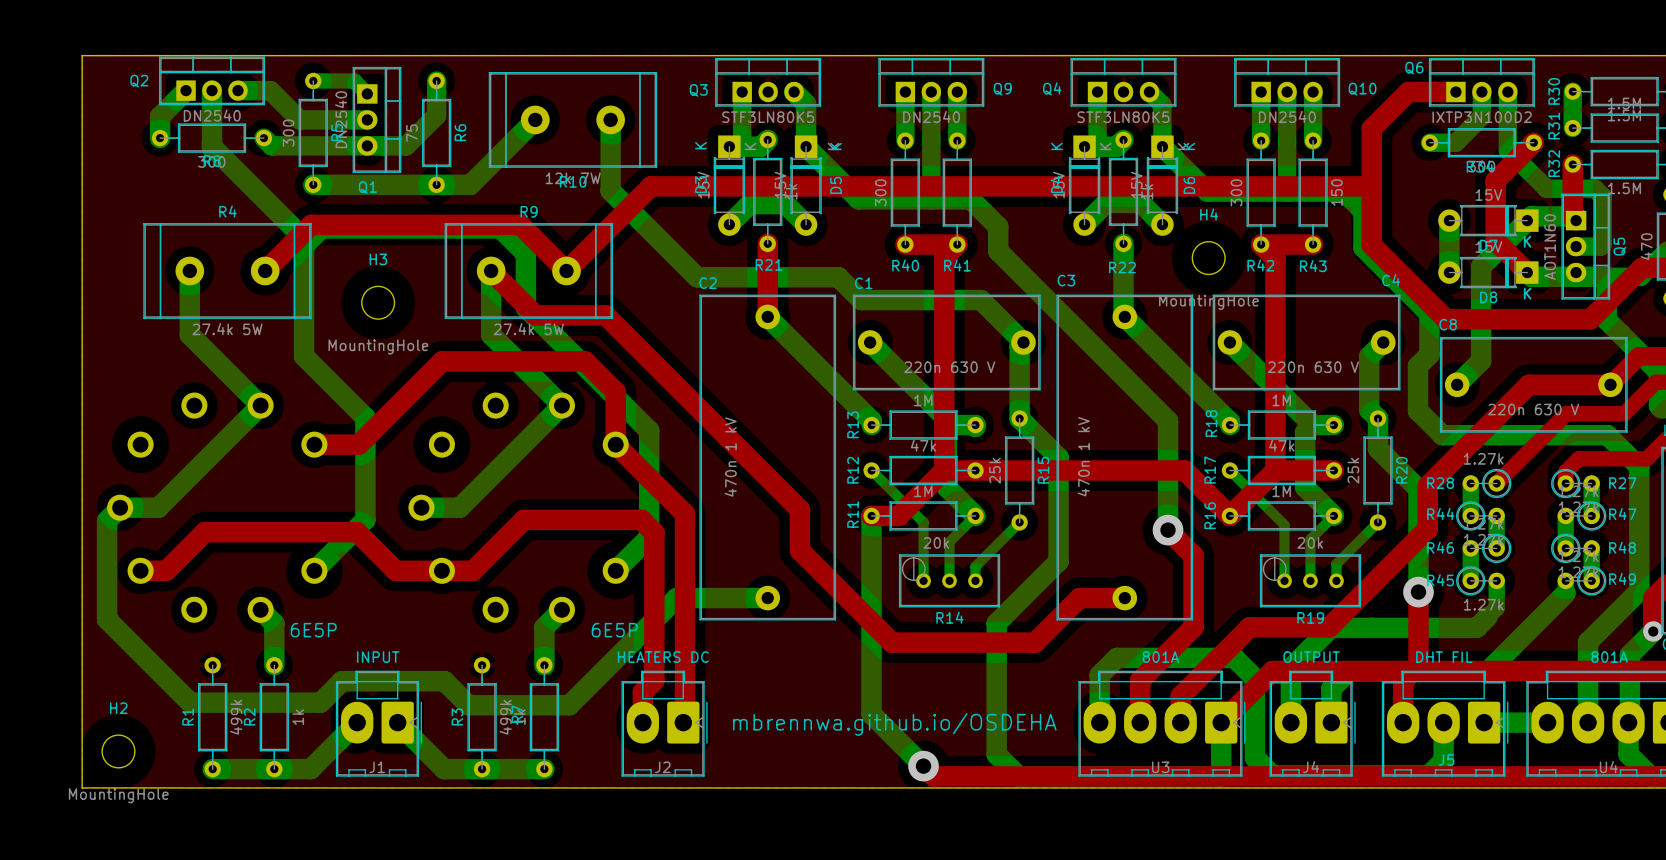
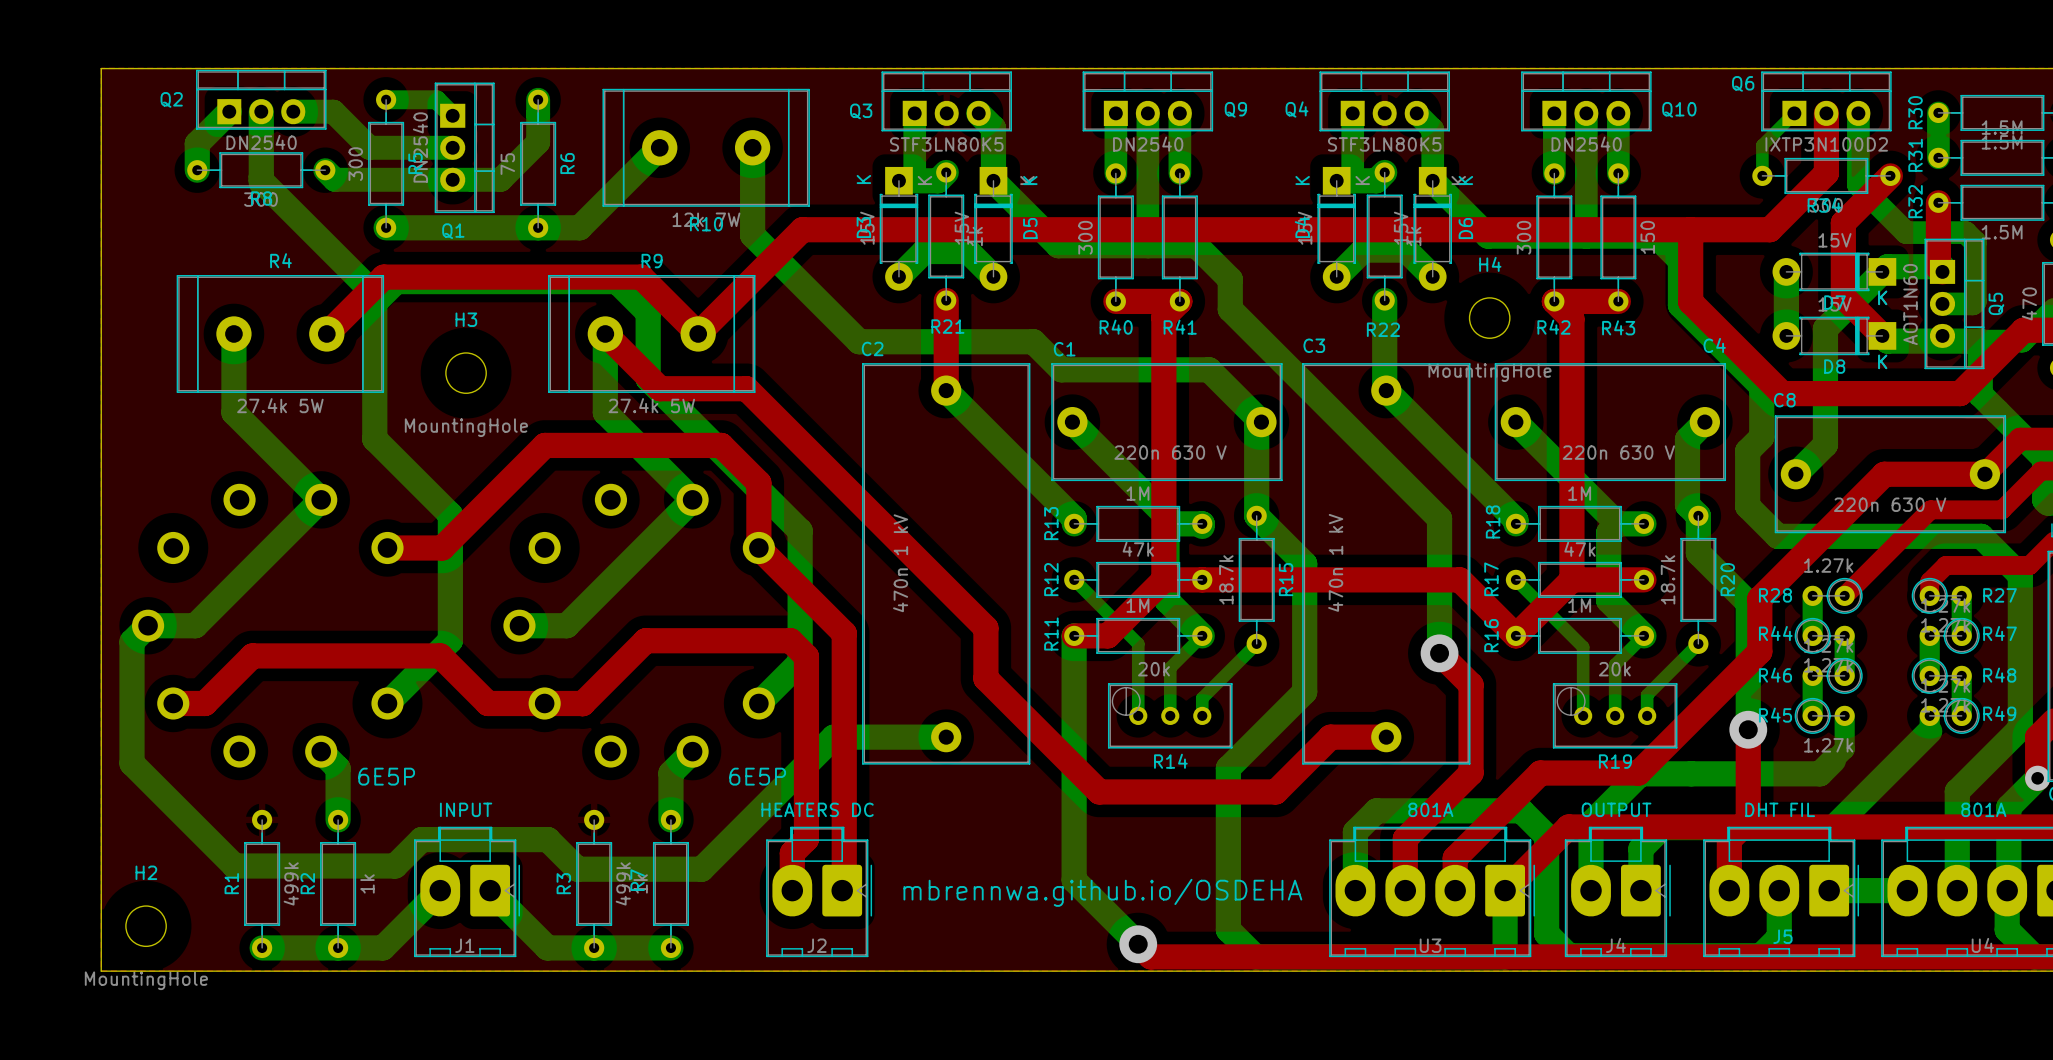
top track: (1451, 92) (1408, 92) (1371, 128) (1371, 186) -> (1826, 113) (1826, 173) (1769, 229) (1690, 229)
bottom track: (1481, 92) (1481, 116) (1455, 142) (1429, 142) -> (1794, 113) (1762, 145) (1762, 175)
R15 value: 25k (995, 470) -> 18.7k (1226, 579)
R20 value: 25k (1353, 470) -> 18.7k (1668, 579)

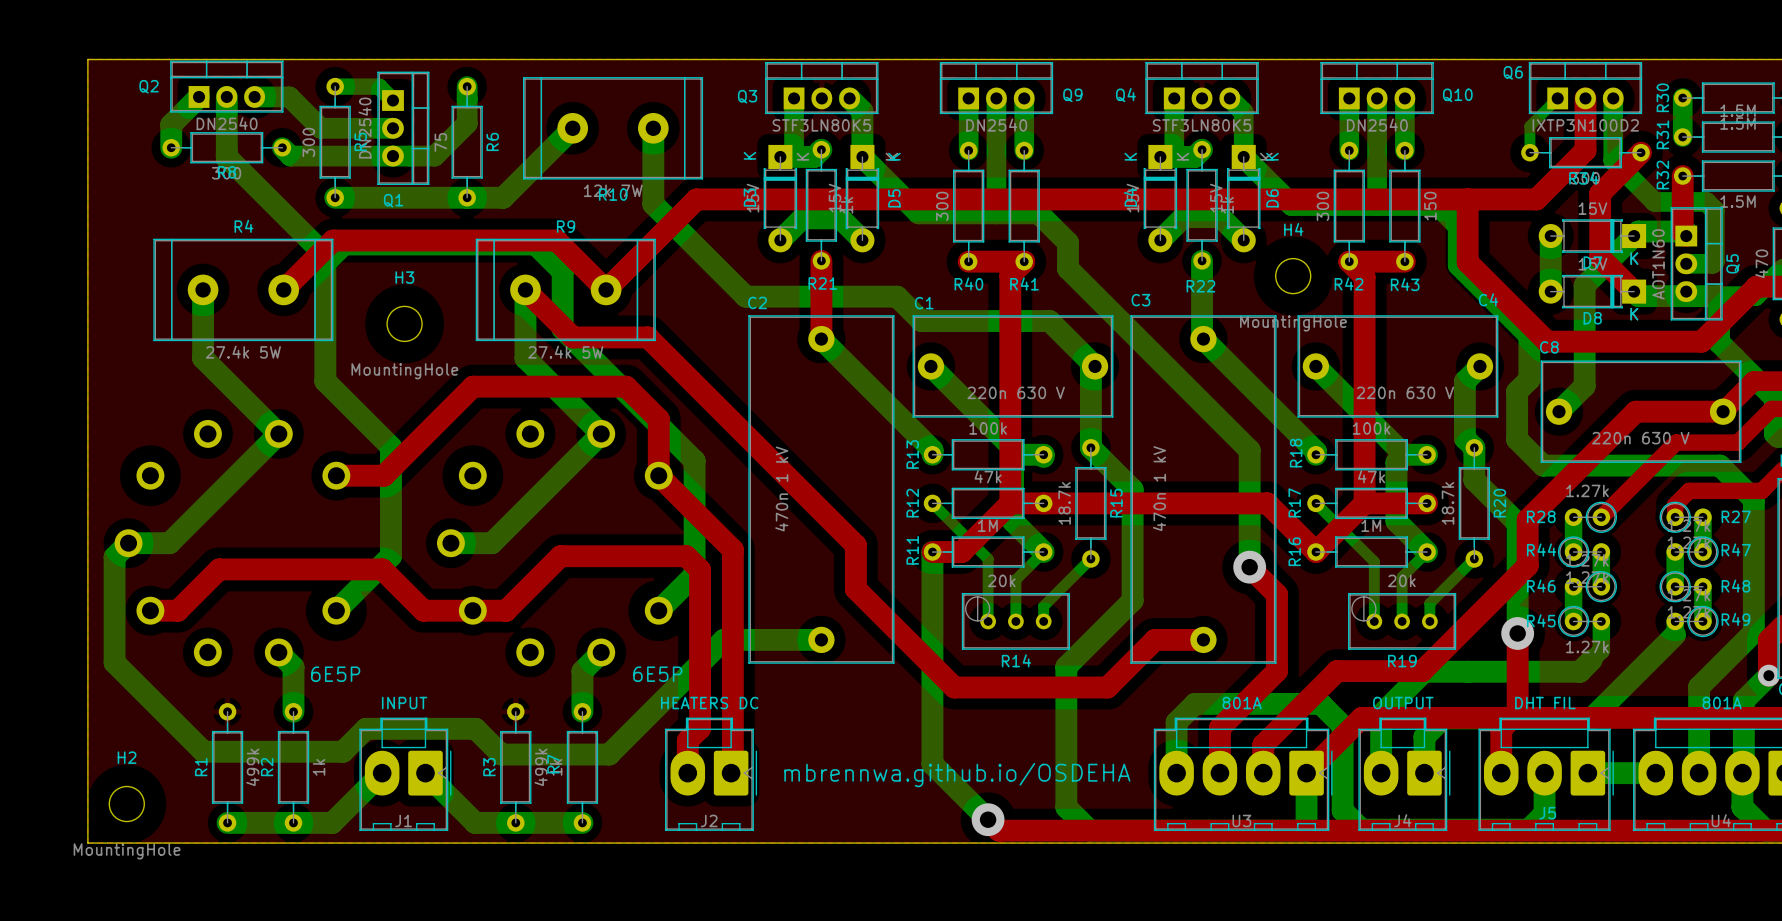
R13 value: 1M (1137, 493) -> 100k (988, 428)
R18 value: 1M (1579, 493) -> 100k (1371, 428)

